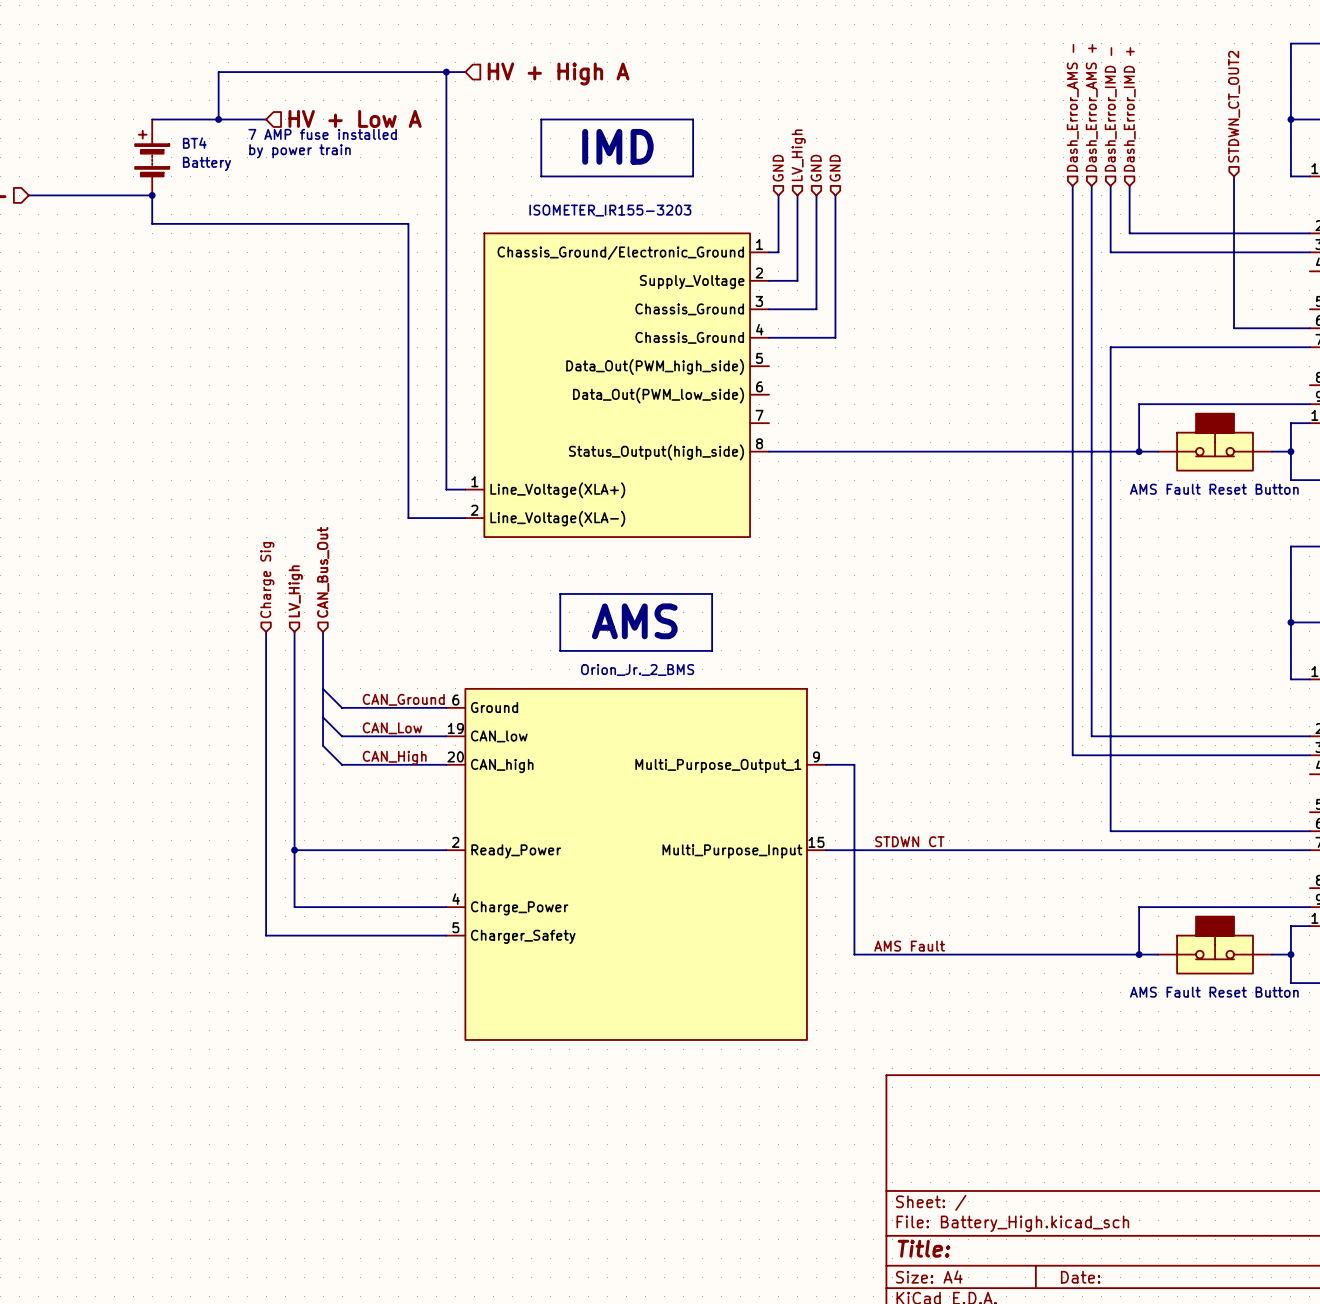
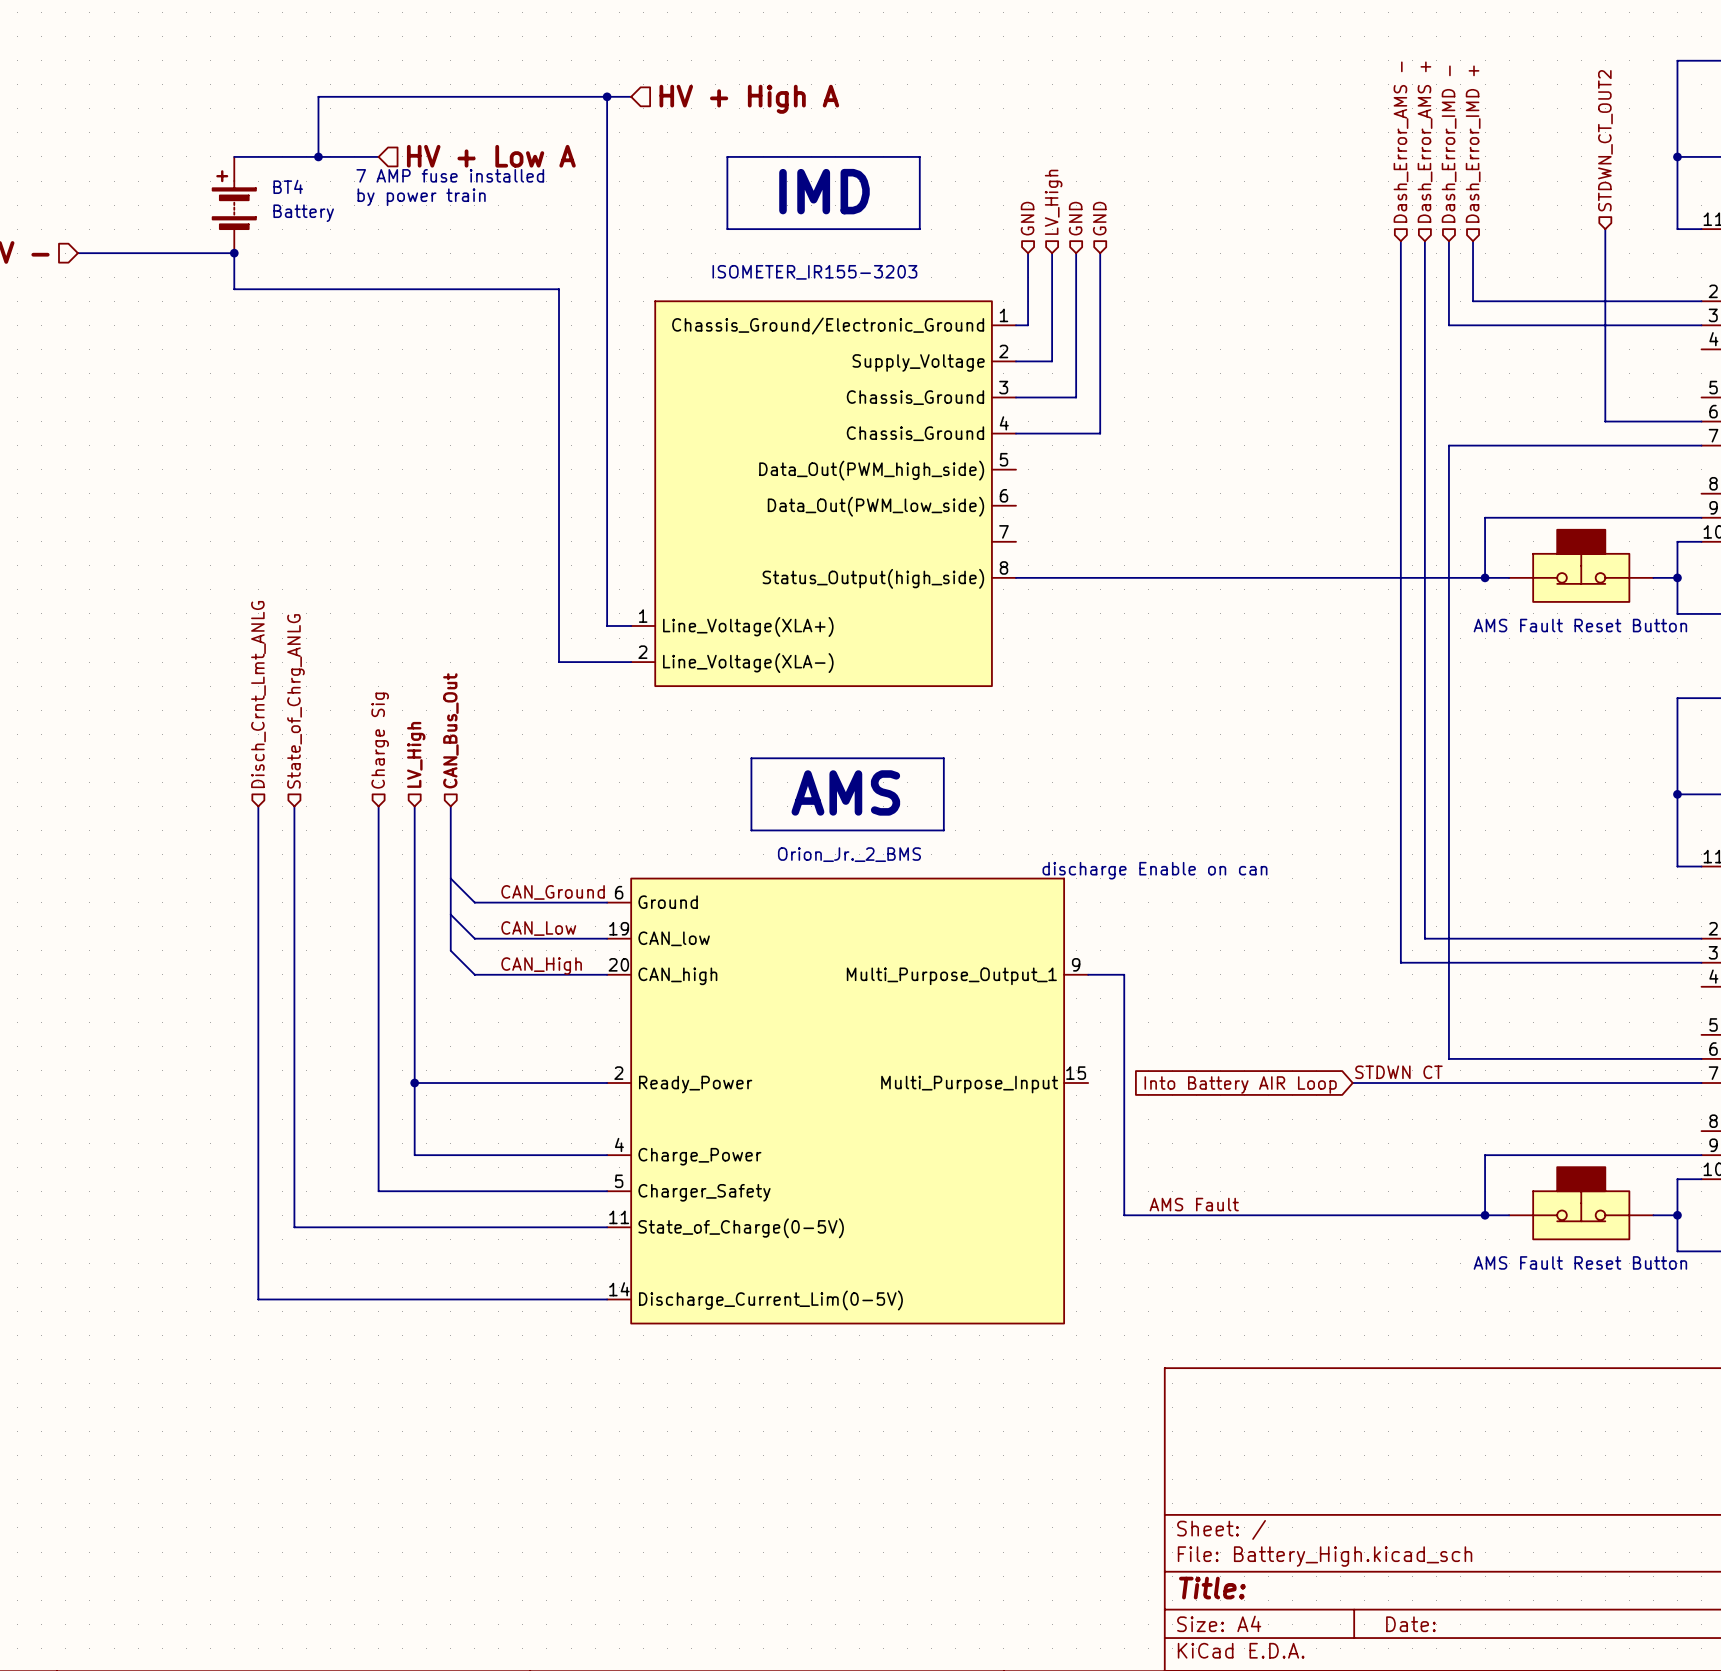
hierarchical label: none -> Disch_Crnt_Lmt_ANLG (258, 694)
hierarchical label: none -> State_of_Chrg_ANLG (295, 701)
wire: none -> (258, 806) (258, 1299) (607, 1299)
wire: none -> (294, 806) (294, 1227) (607, 1227)
text: none -> discharge Enable on can (1154, 870)
part symbol: [446, 688, 826, 1040] -> [607, 878, 1089, 1324]
label position: STDWN CT (909, 841) -> STDWN CT (1398, 1072)
wire: (825, 850) (1034, 850) -> none
global label: none -> Into Battery AIR Loop (1240, 1085)

